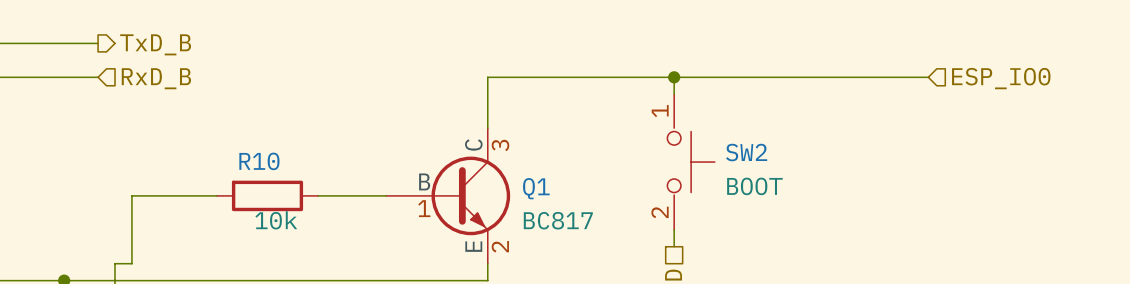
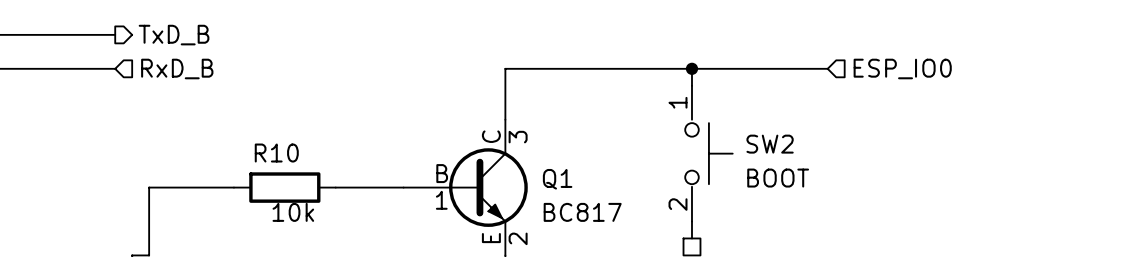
wire: (809, 77) (928, 77) -> none
hierarchical label position: ESP_IO0 (1001, 78) -> ESP_IO0 (902, 68)

